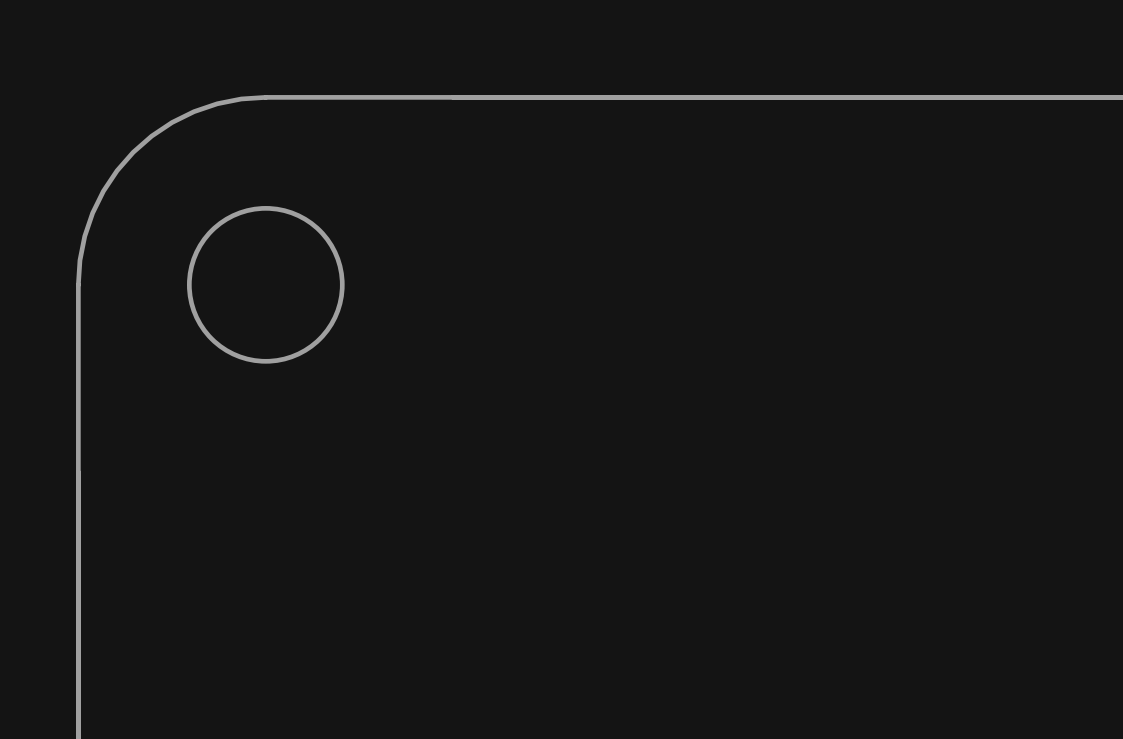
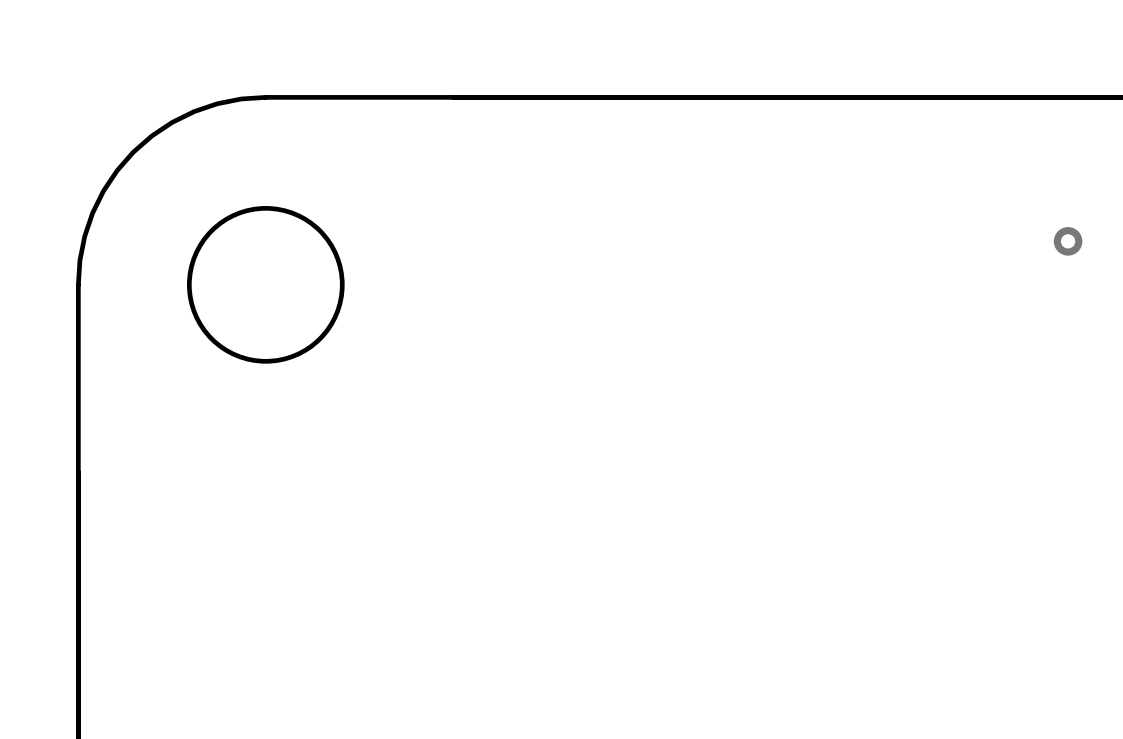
via: none -> (1068, 241)

